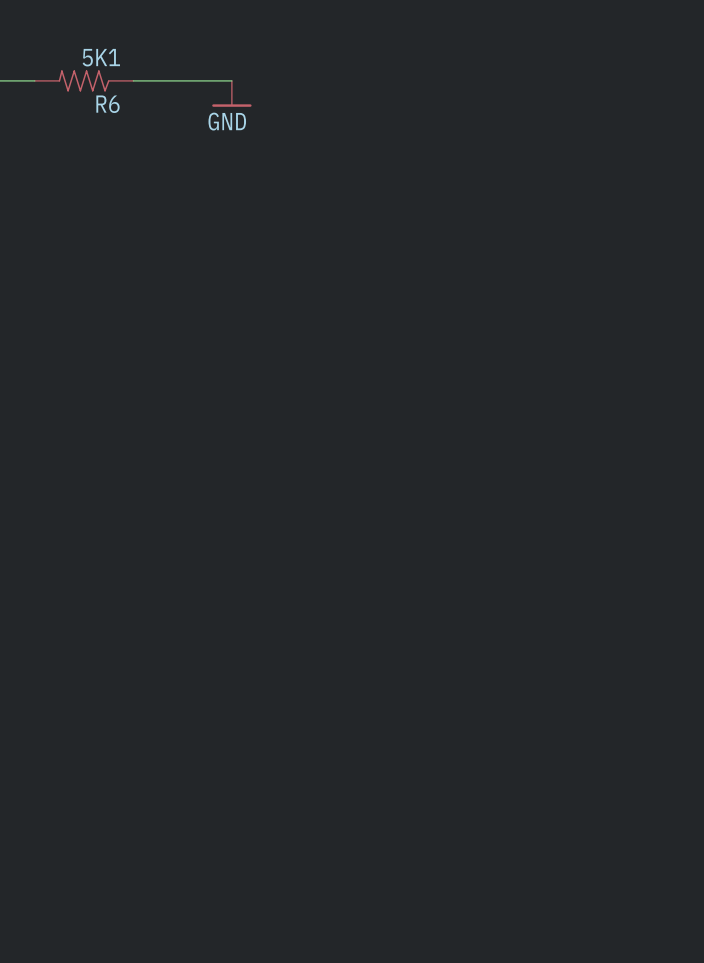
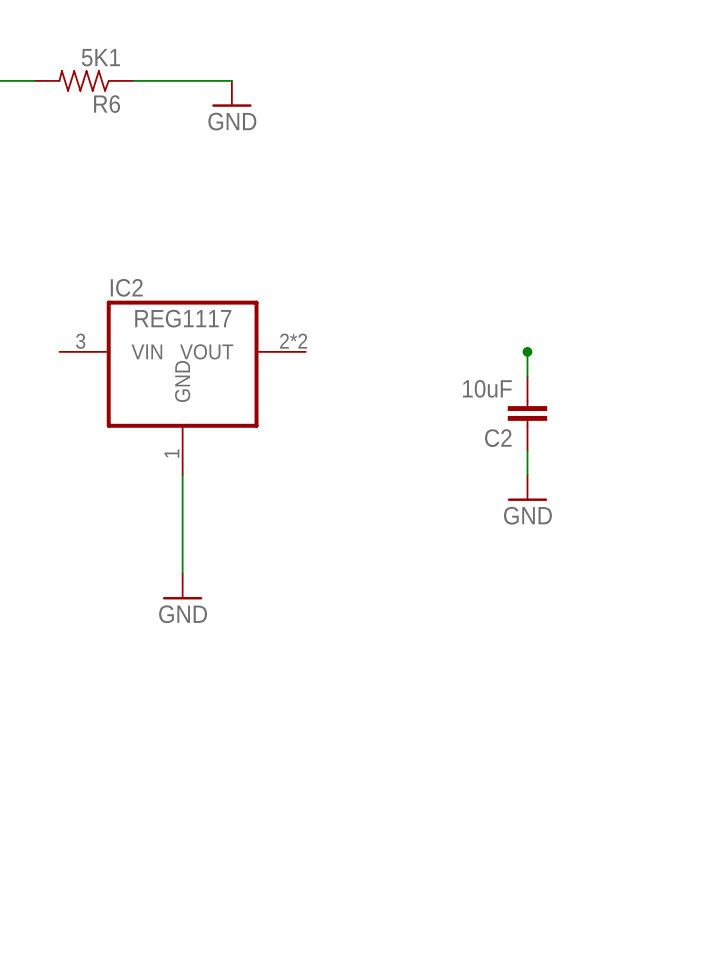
wire: none -> (527, 351) (527, 376)
junction: none -> (527, 351)
IC2: none -> REG1117 (182, 387)
C2: none -> 10uF (527, 413)
wire: none -> (527, 450) (527, 475)
wire: none -> (182, 475) (182, 573)
power symbol: none -> GND (527, 487)
power symbol: none -> GND (182, 586)

